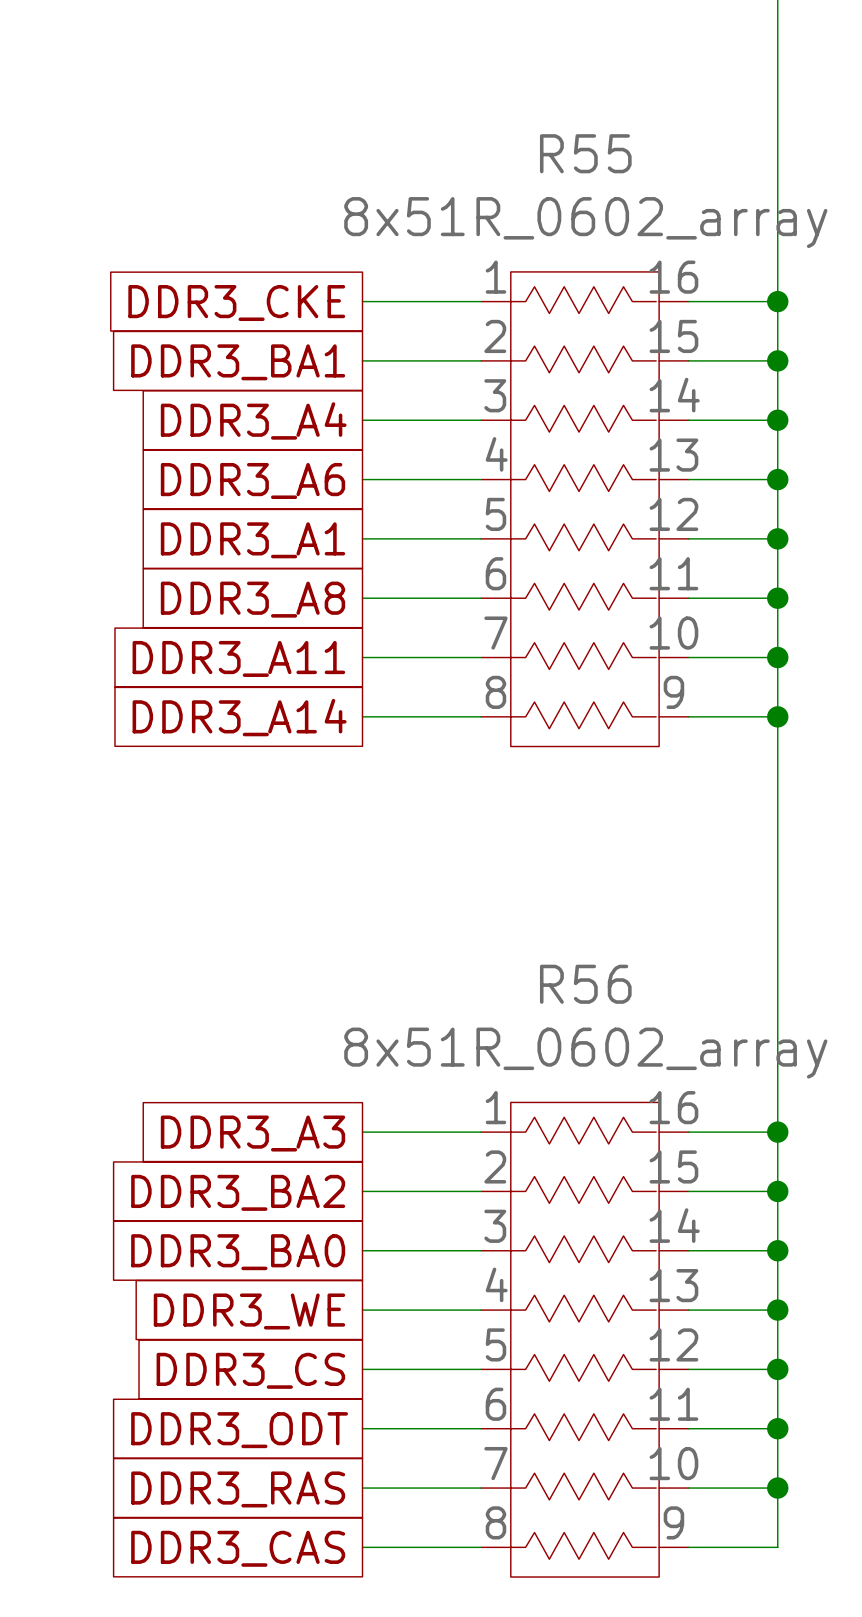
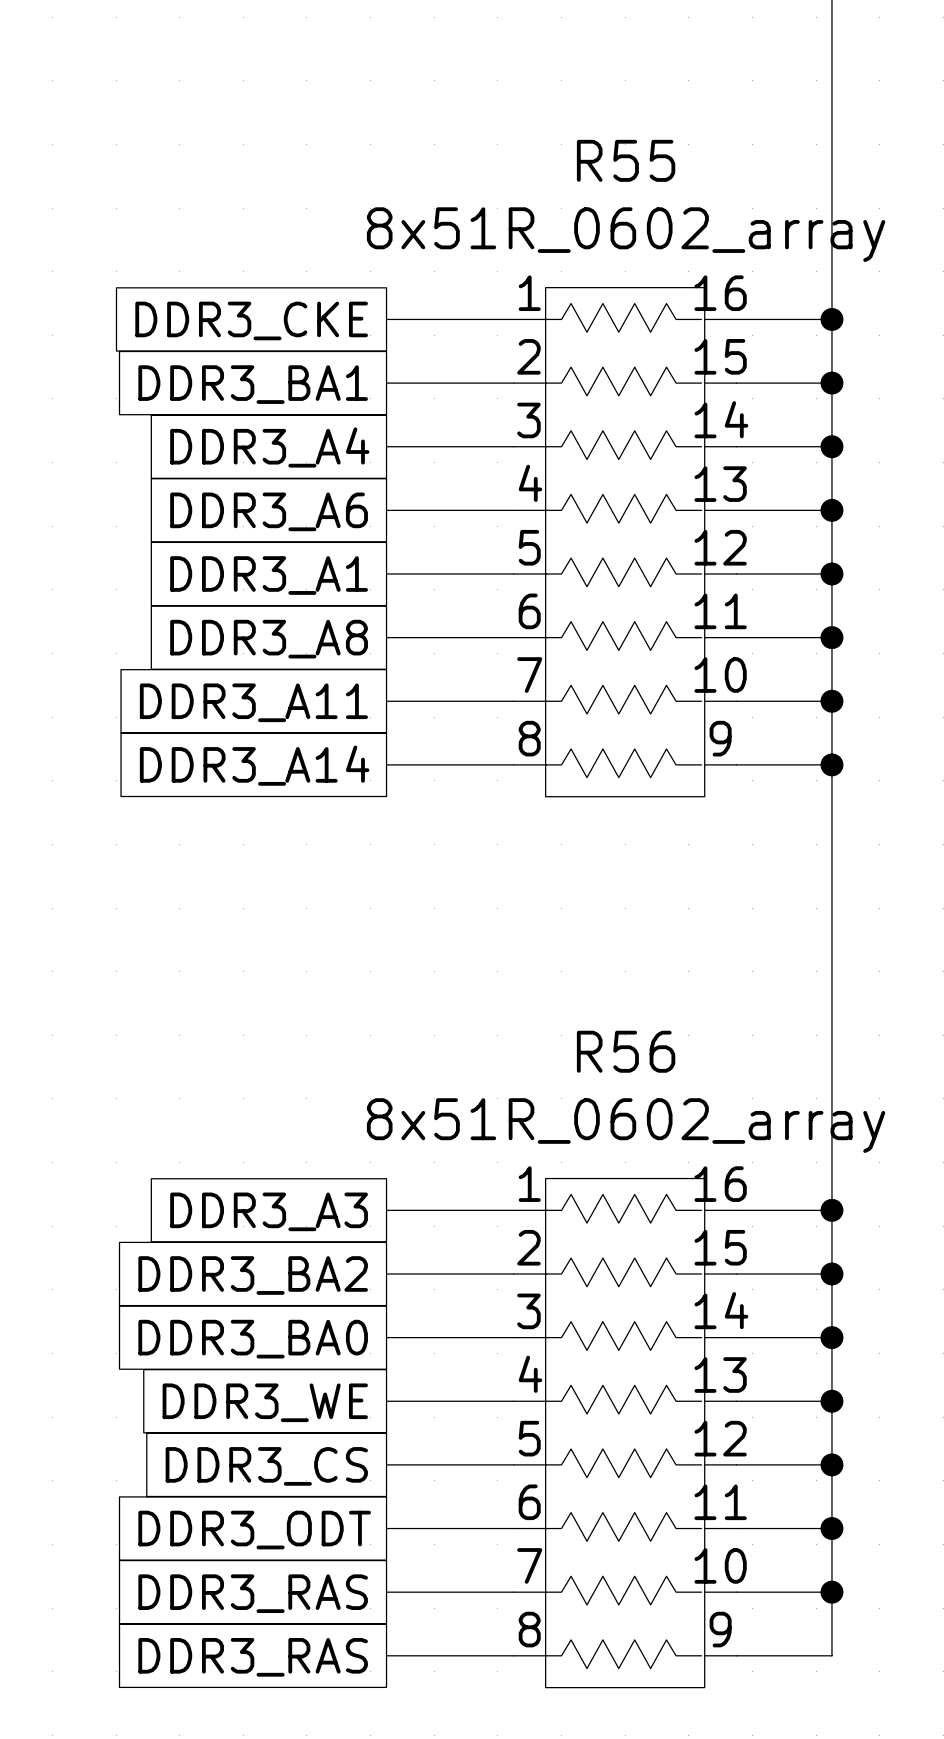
global label: DDR3_CAS (238, 1548) -> DDR3_RAS (253, 1657)

